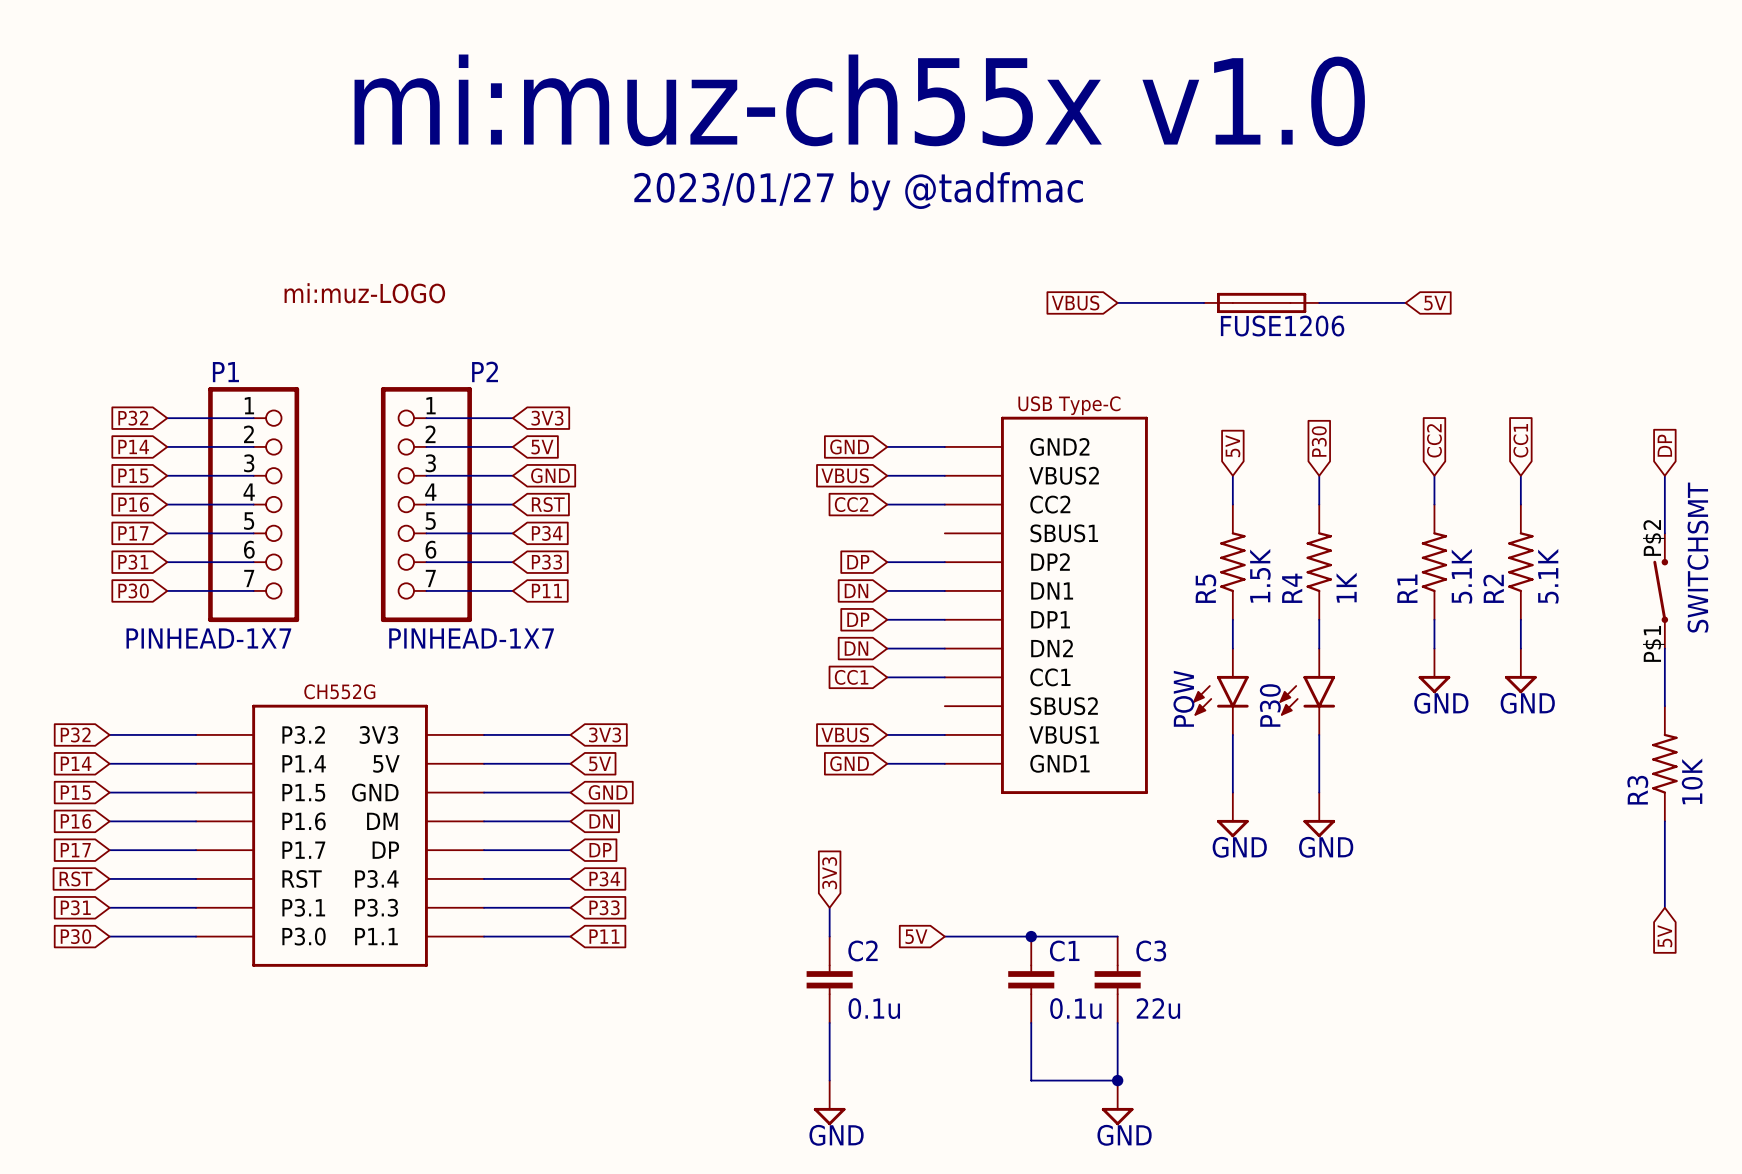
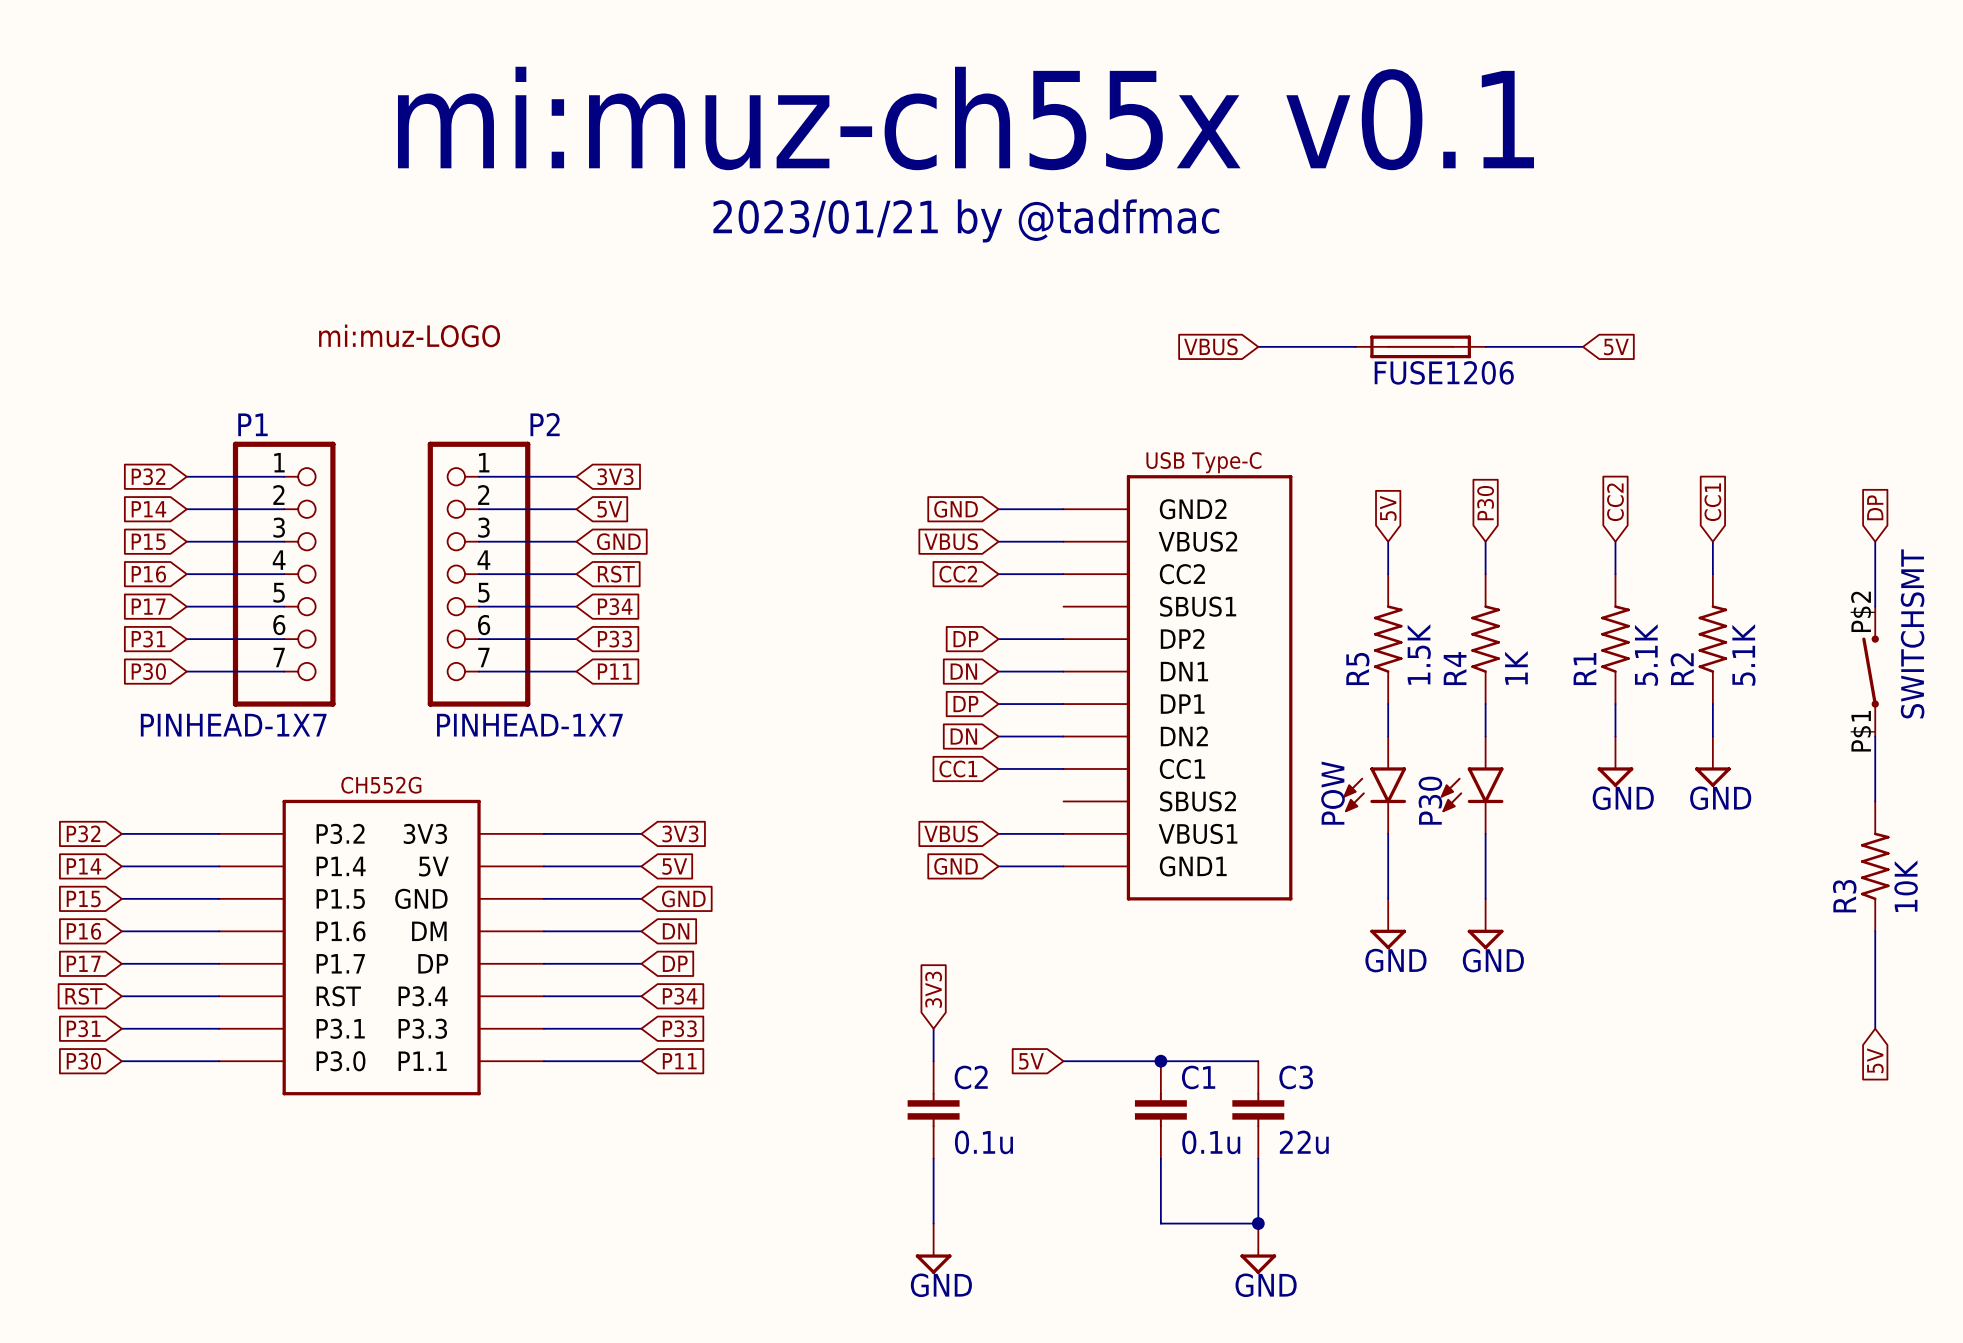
text: mi:muz-ch55x v1.0 (859, 100) -> mi:muz-ch55x v0.1 (965, 118)
text: 2023/01/27 by @tadfmac (858, 191) -> 2023/01/21 by @tadfmac (966, 220)

